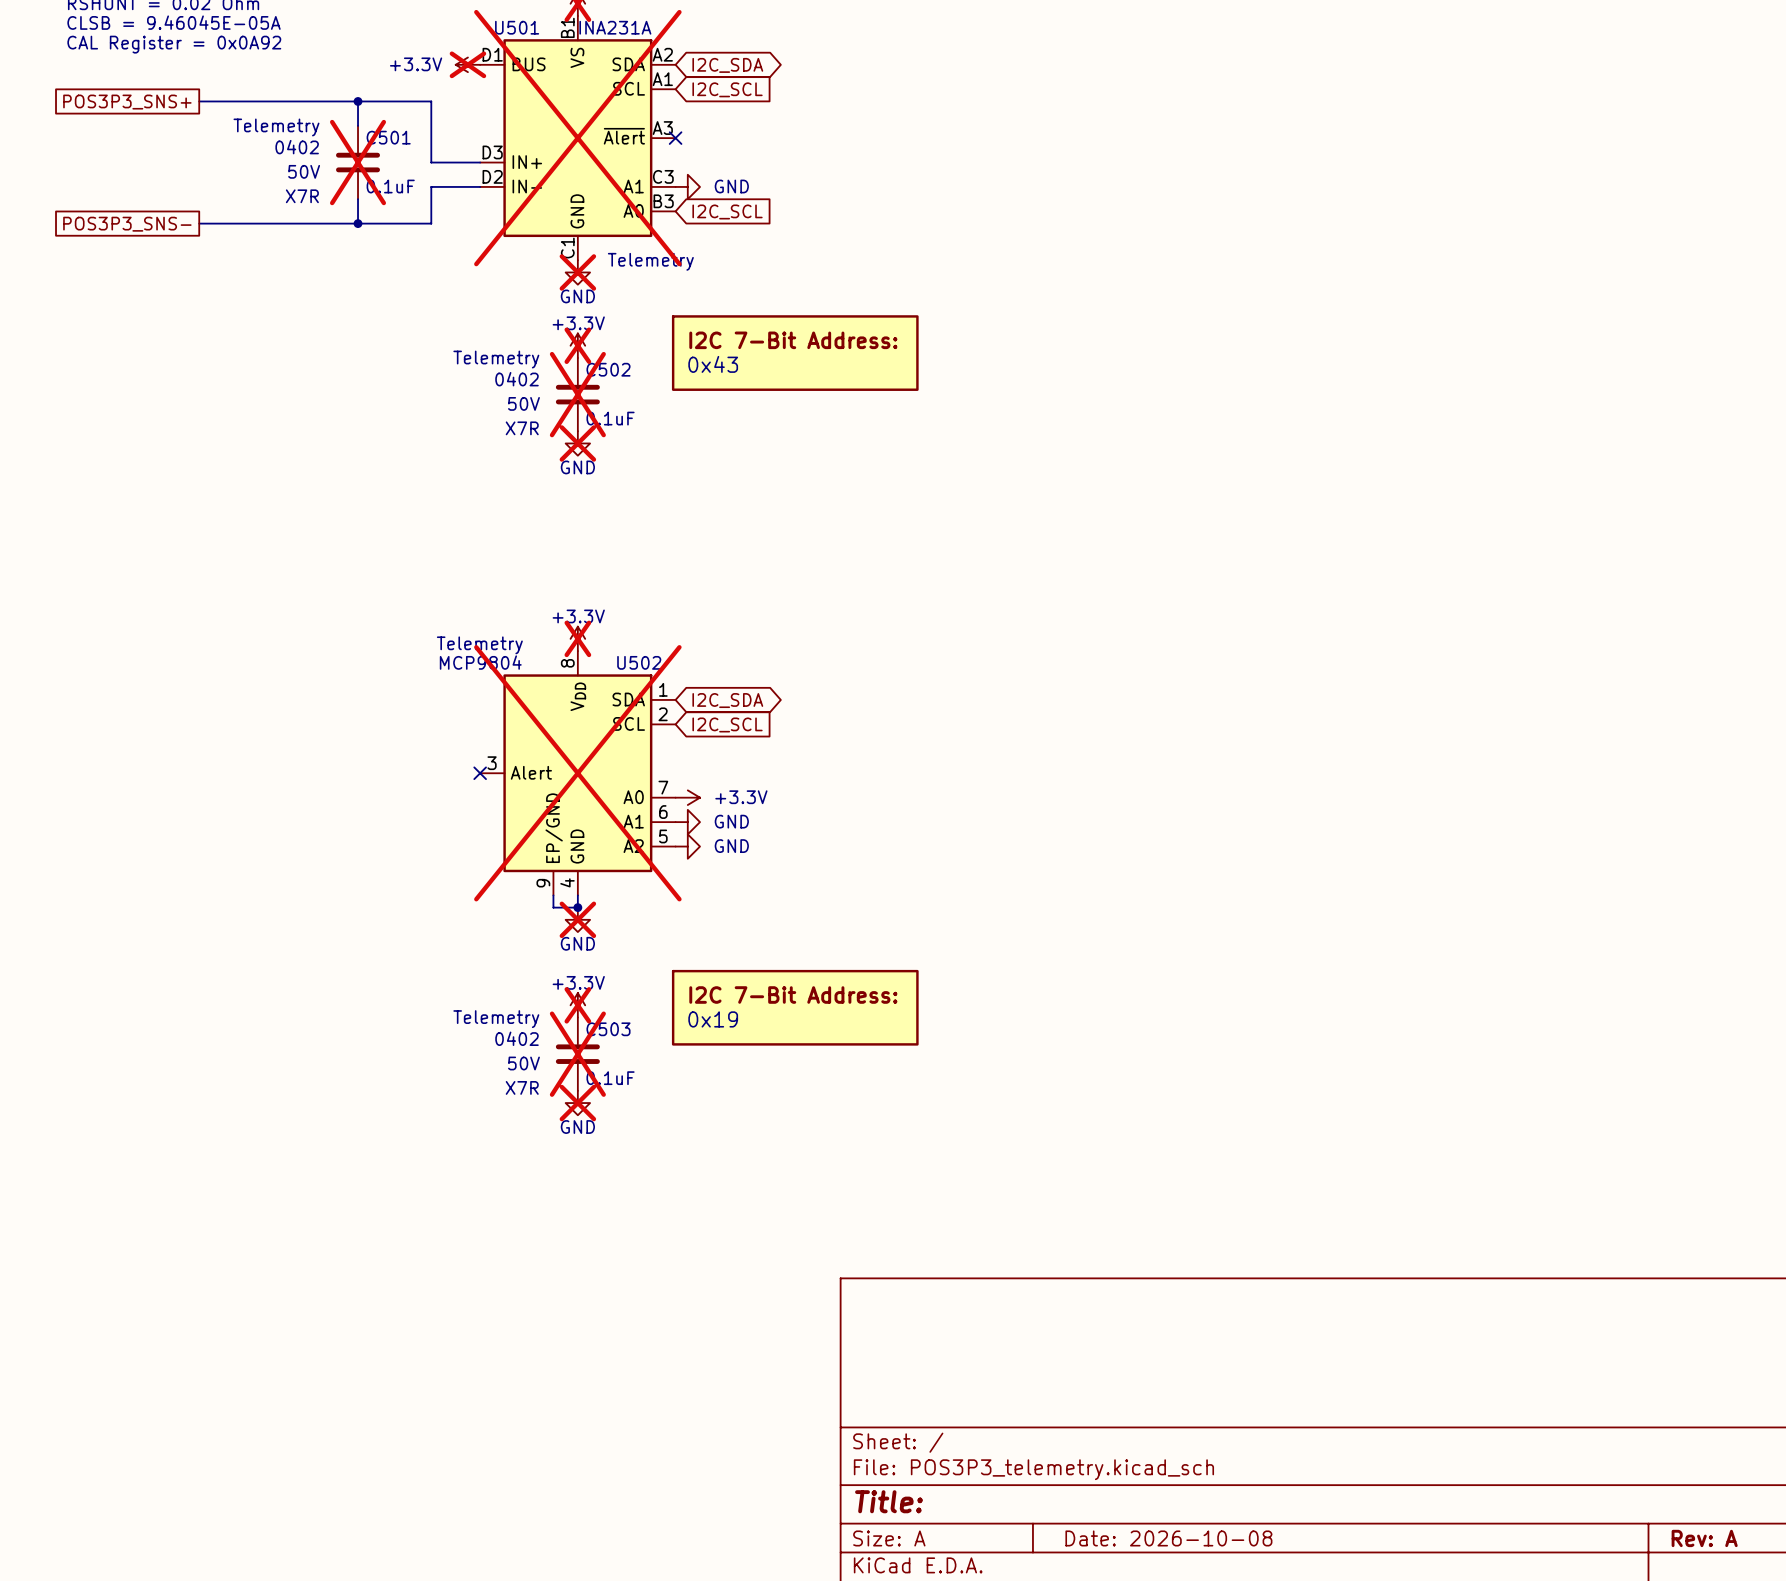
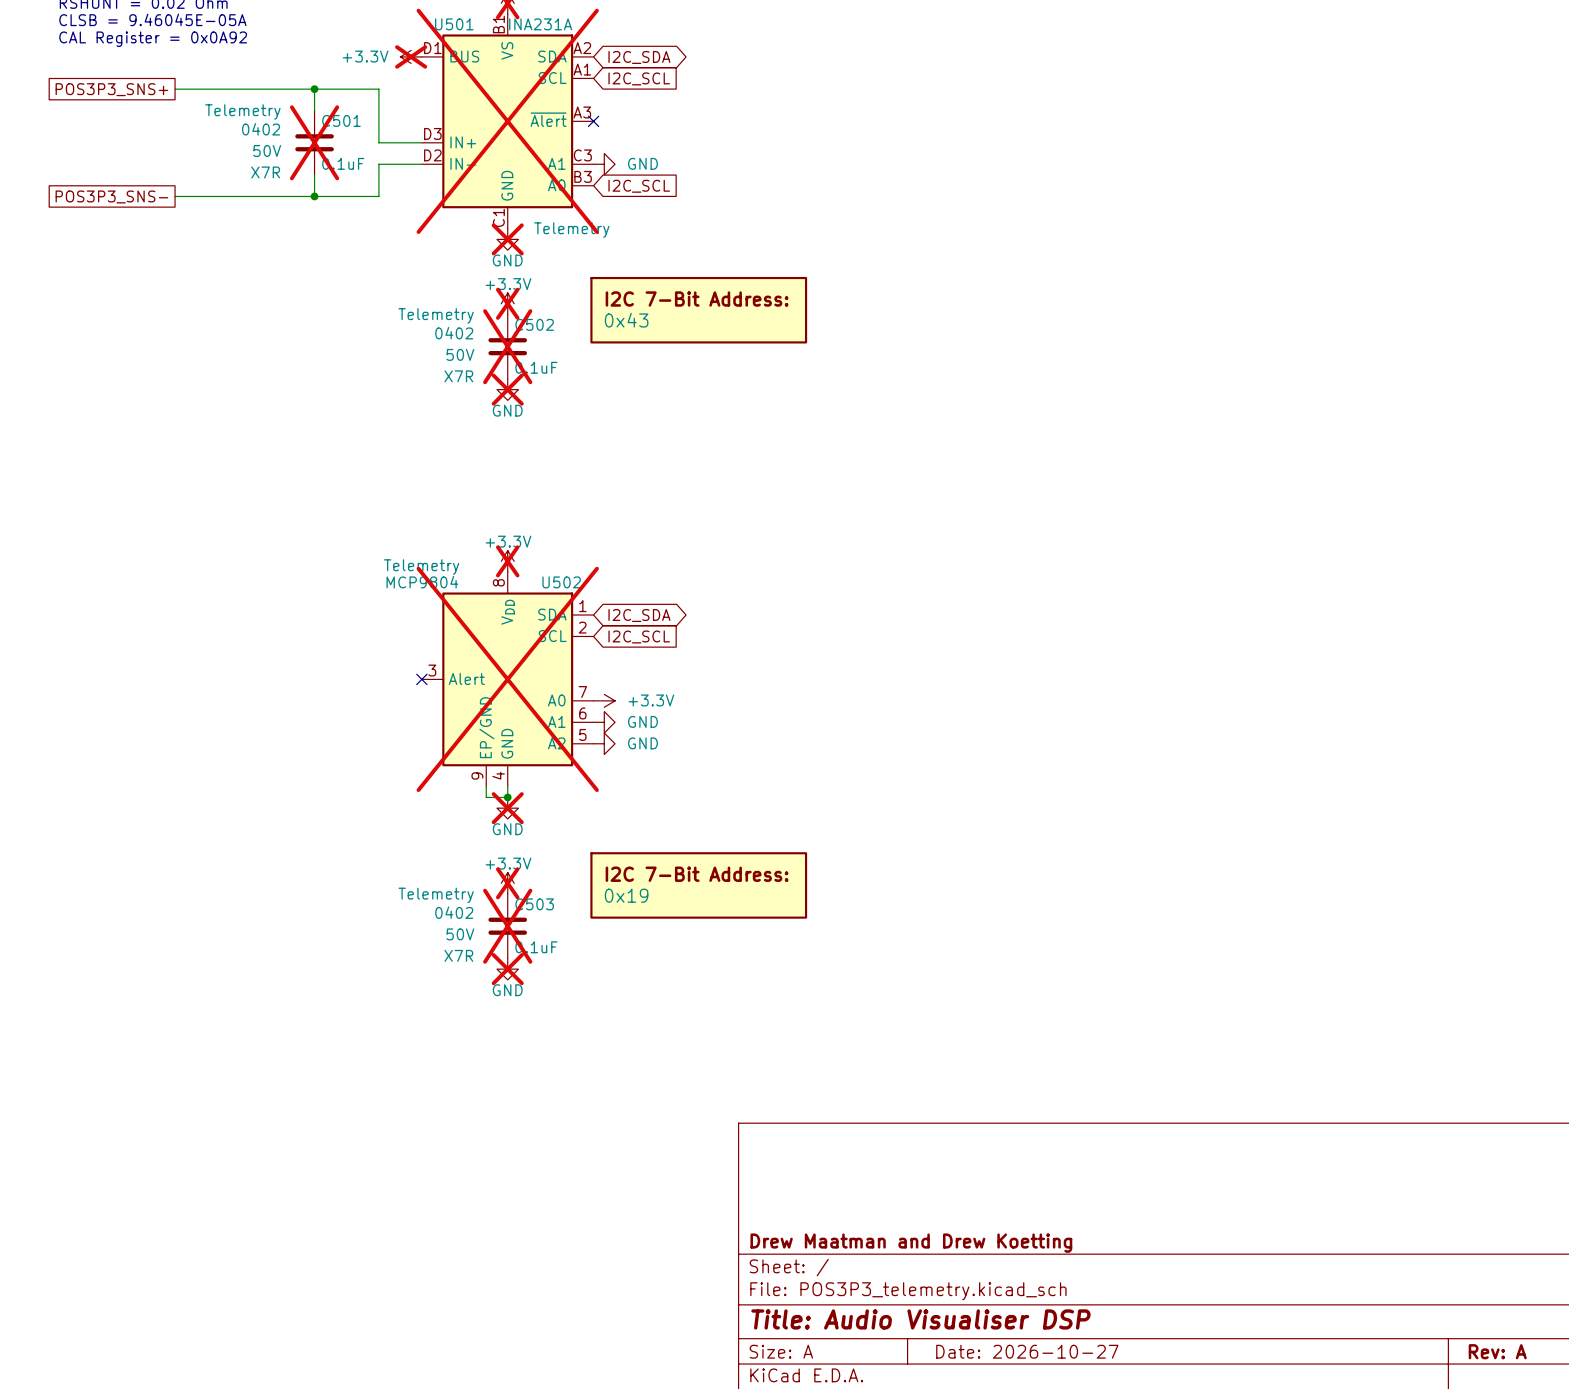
title block: none -> Drew Maatman and Drew Koetting (911, 1243)
title block: Title: (889, 1501) -> Title: Audio Visualiser DSP (920, 1319)
title block: Date: 2026-10-08 (1168, 1538) -> Date: 2026-10-27 (1027, 1351)

